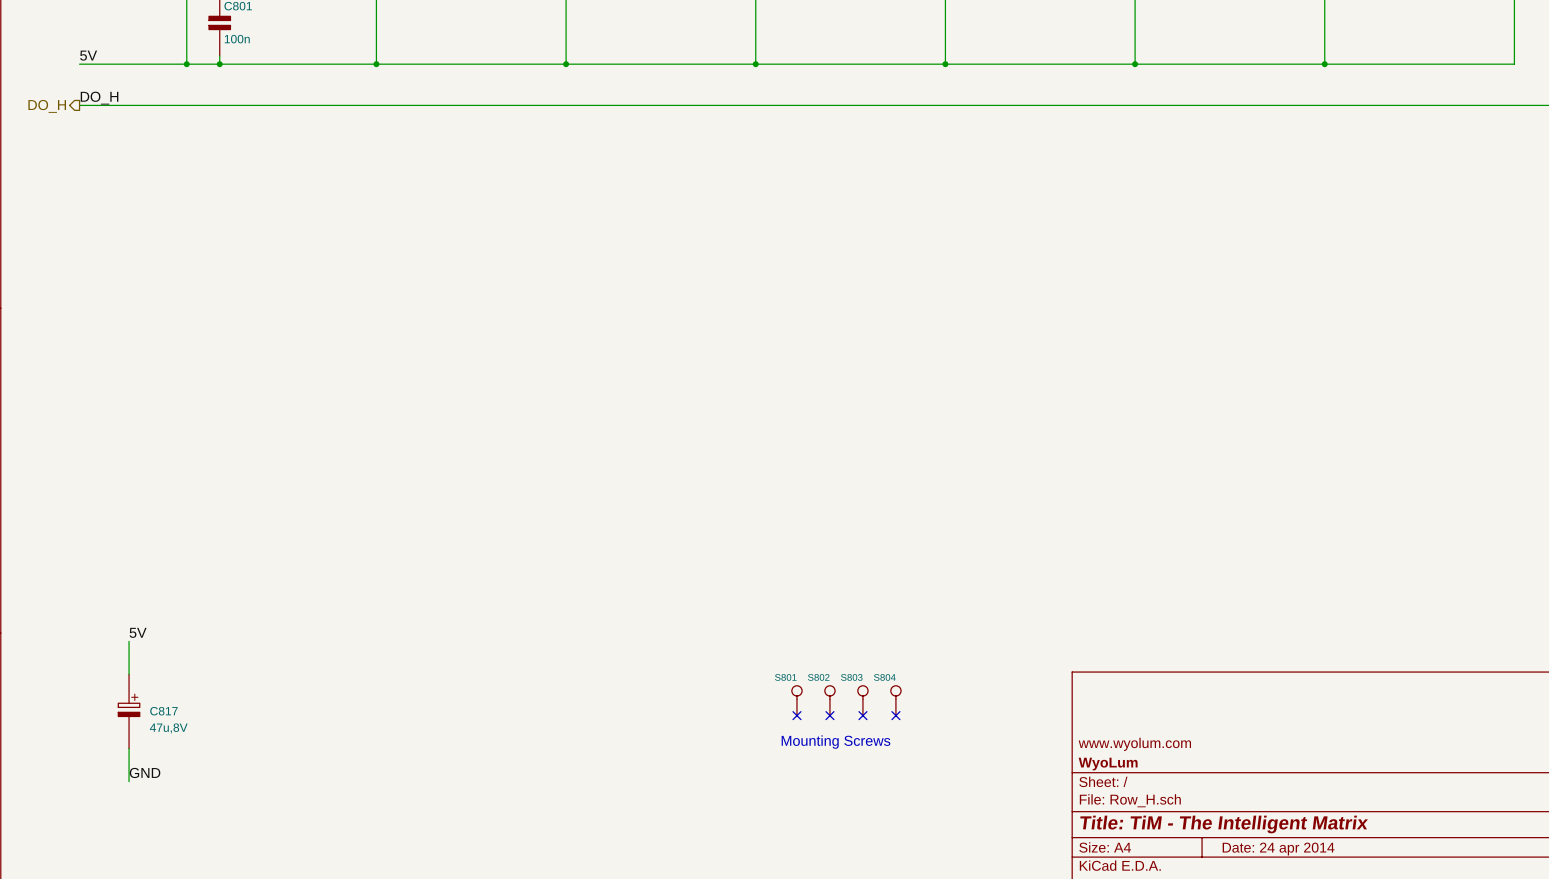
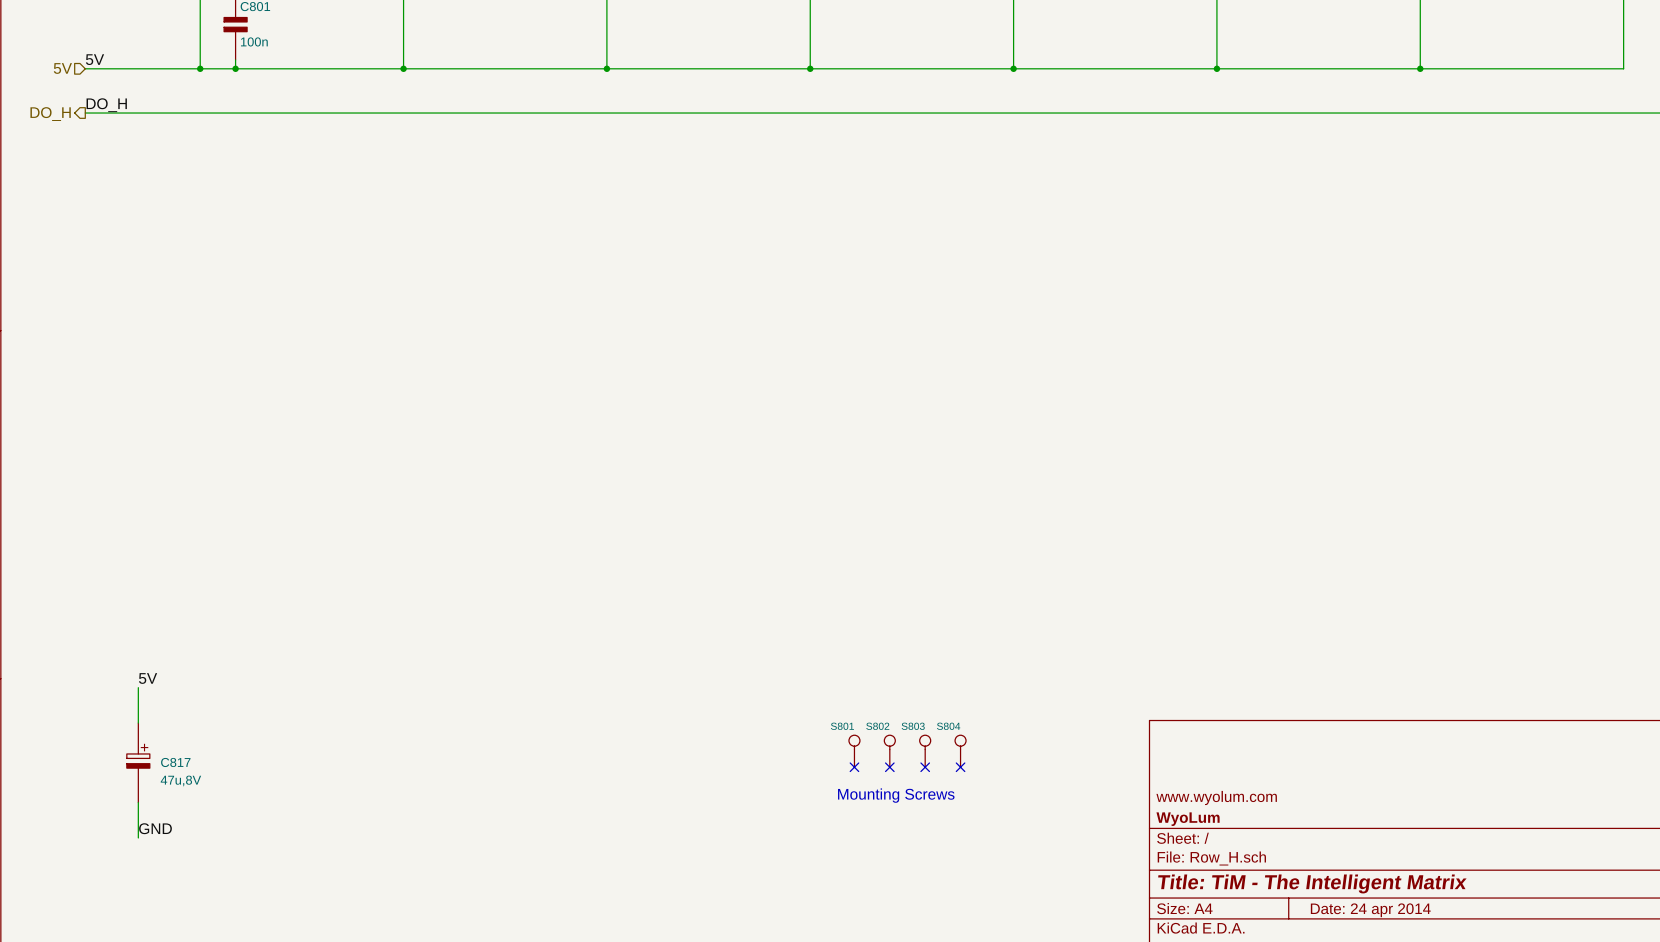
hierarchical label: none -> 5V (62, 68)

